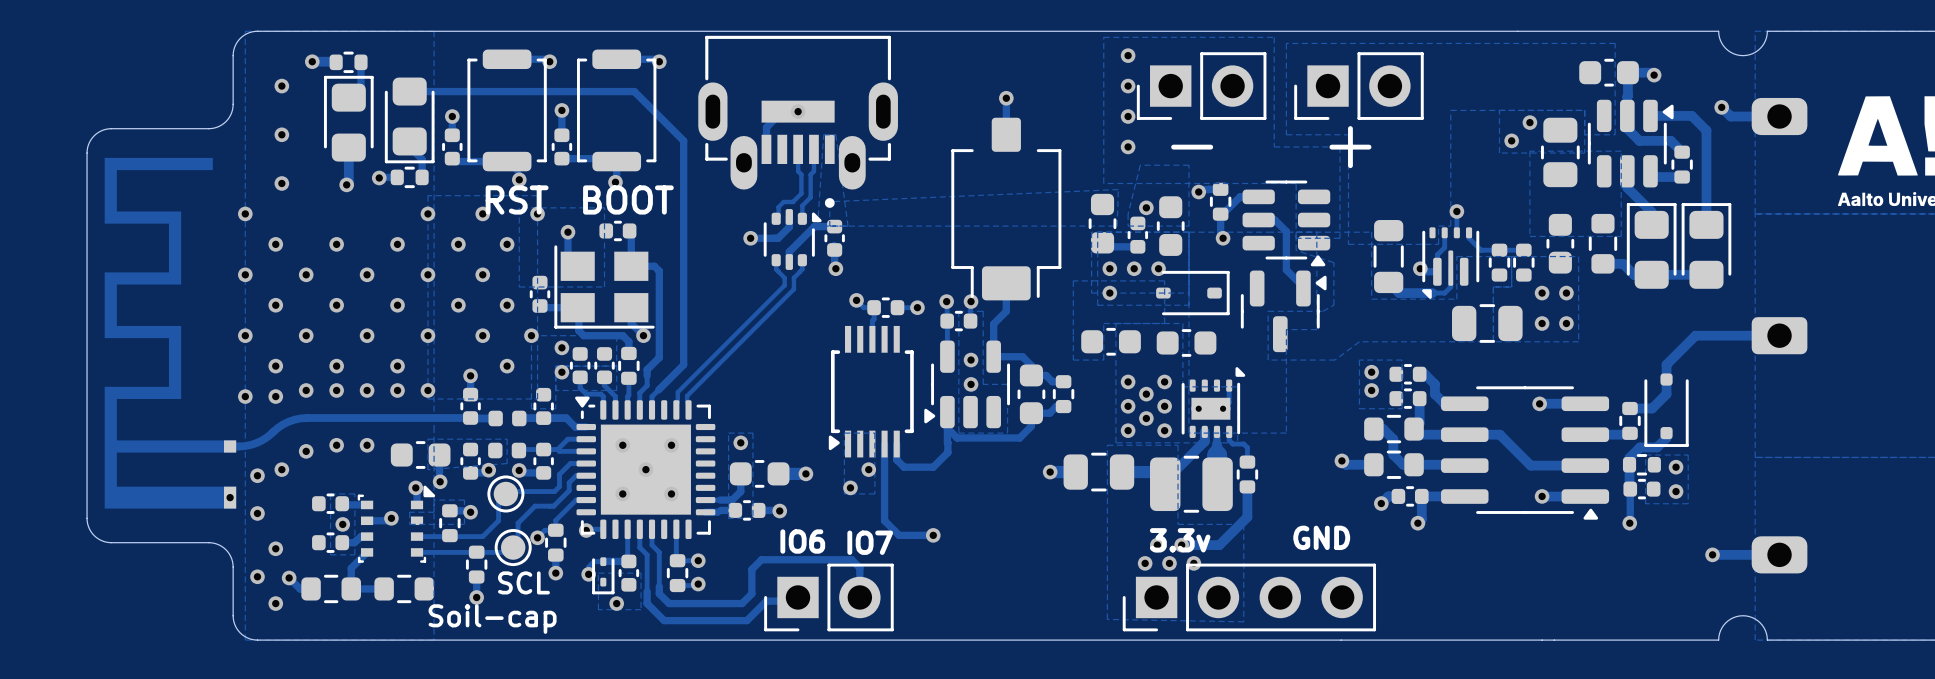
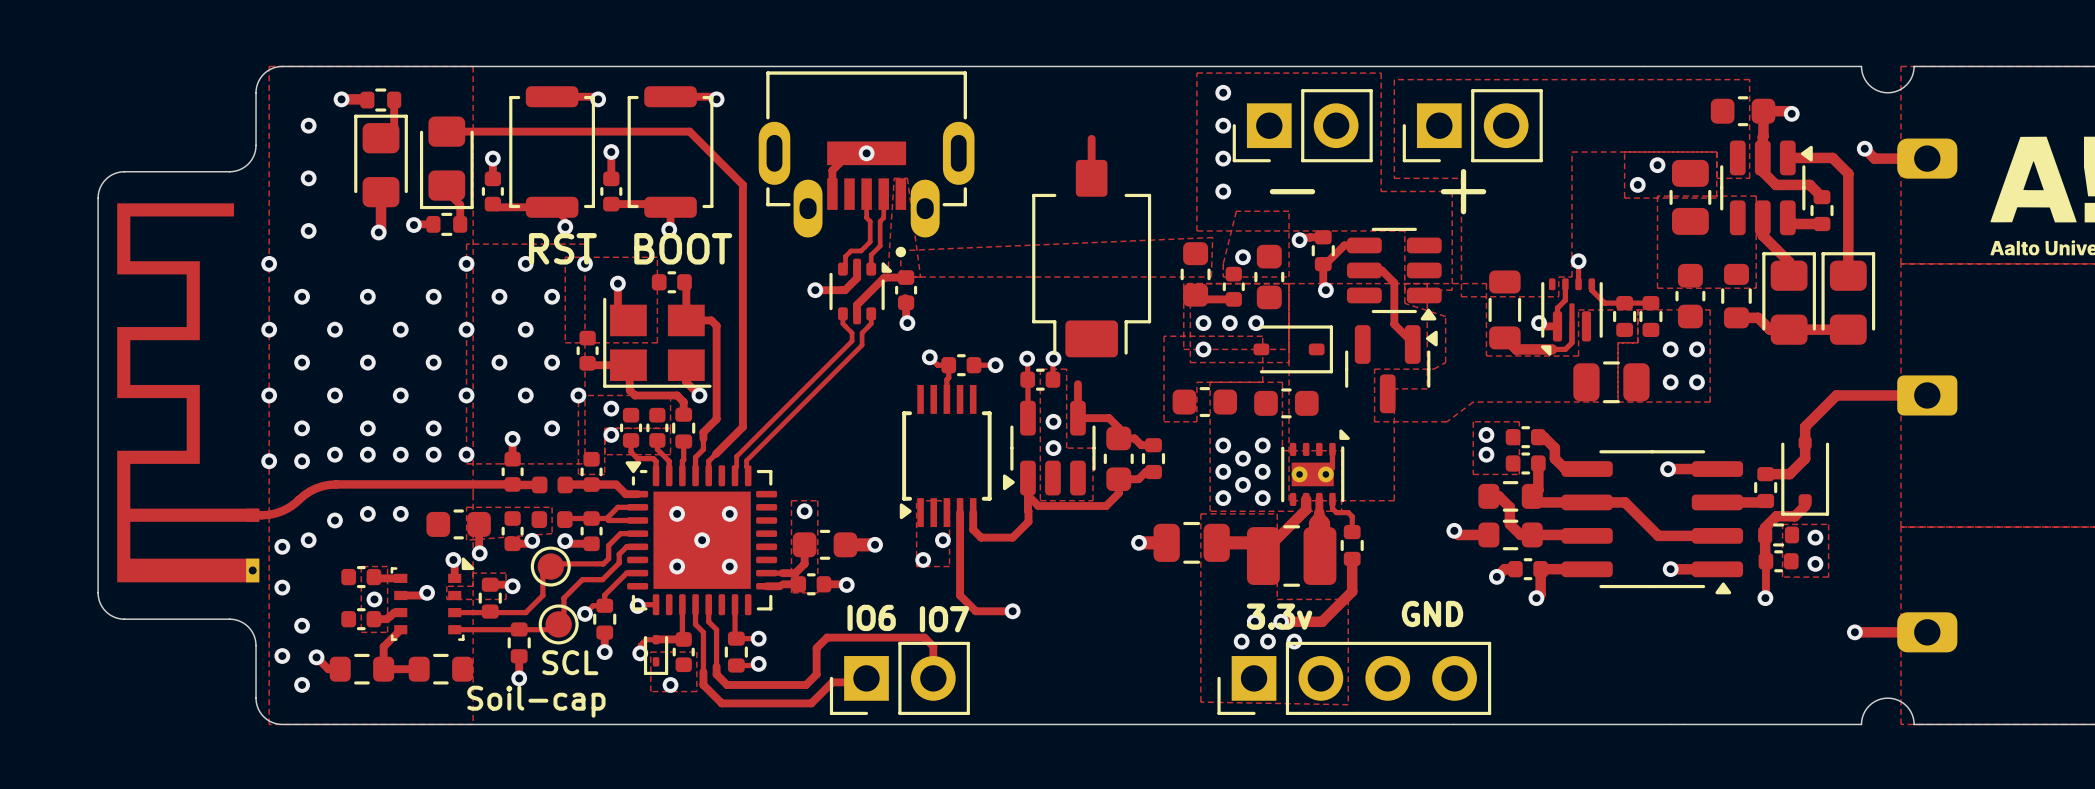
via: (1006, 98) -> none
track: (1006, 283) (1006, 311) (993, 325) -> none

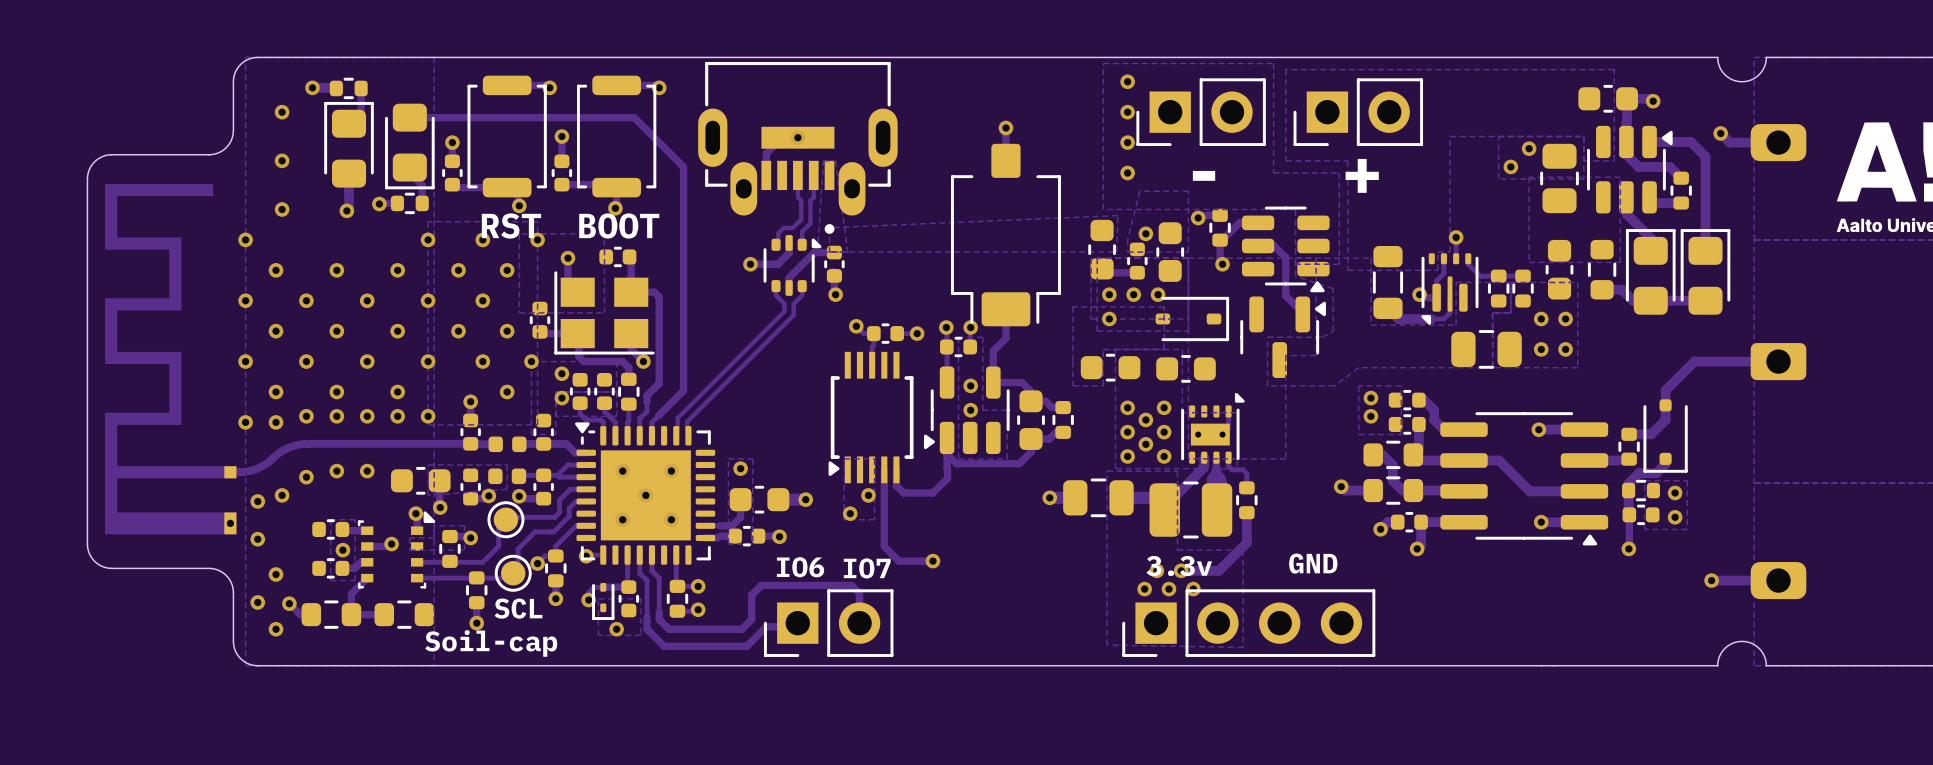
via: none -> (1005, 127)
track: none -> (1005, 309) (1005, 338) (993, 351)

